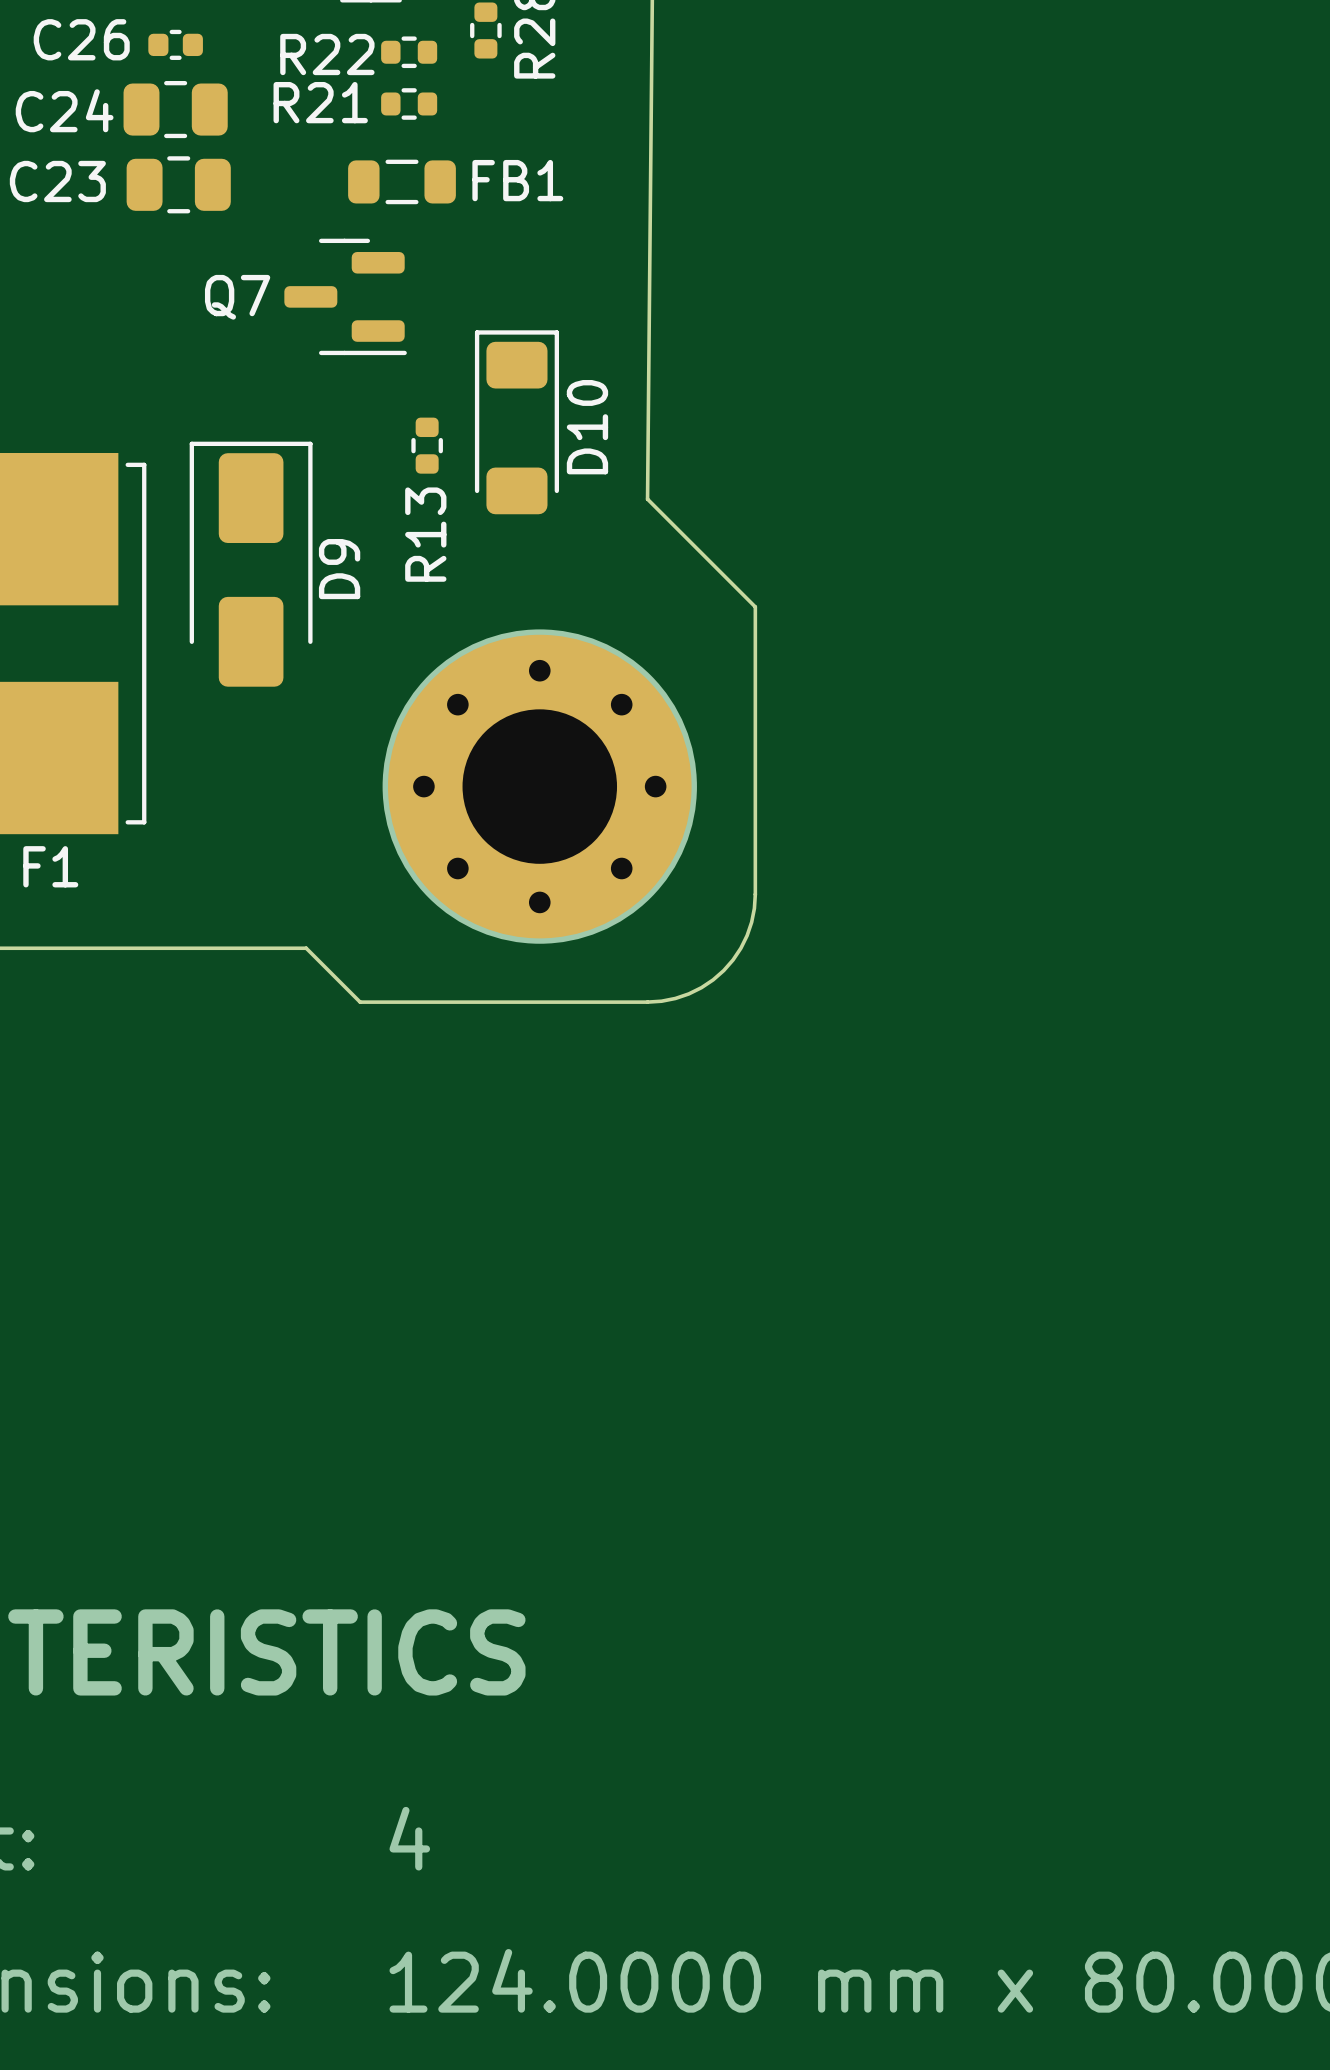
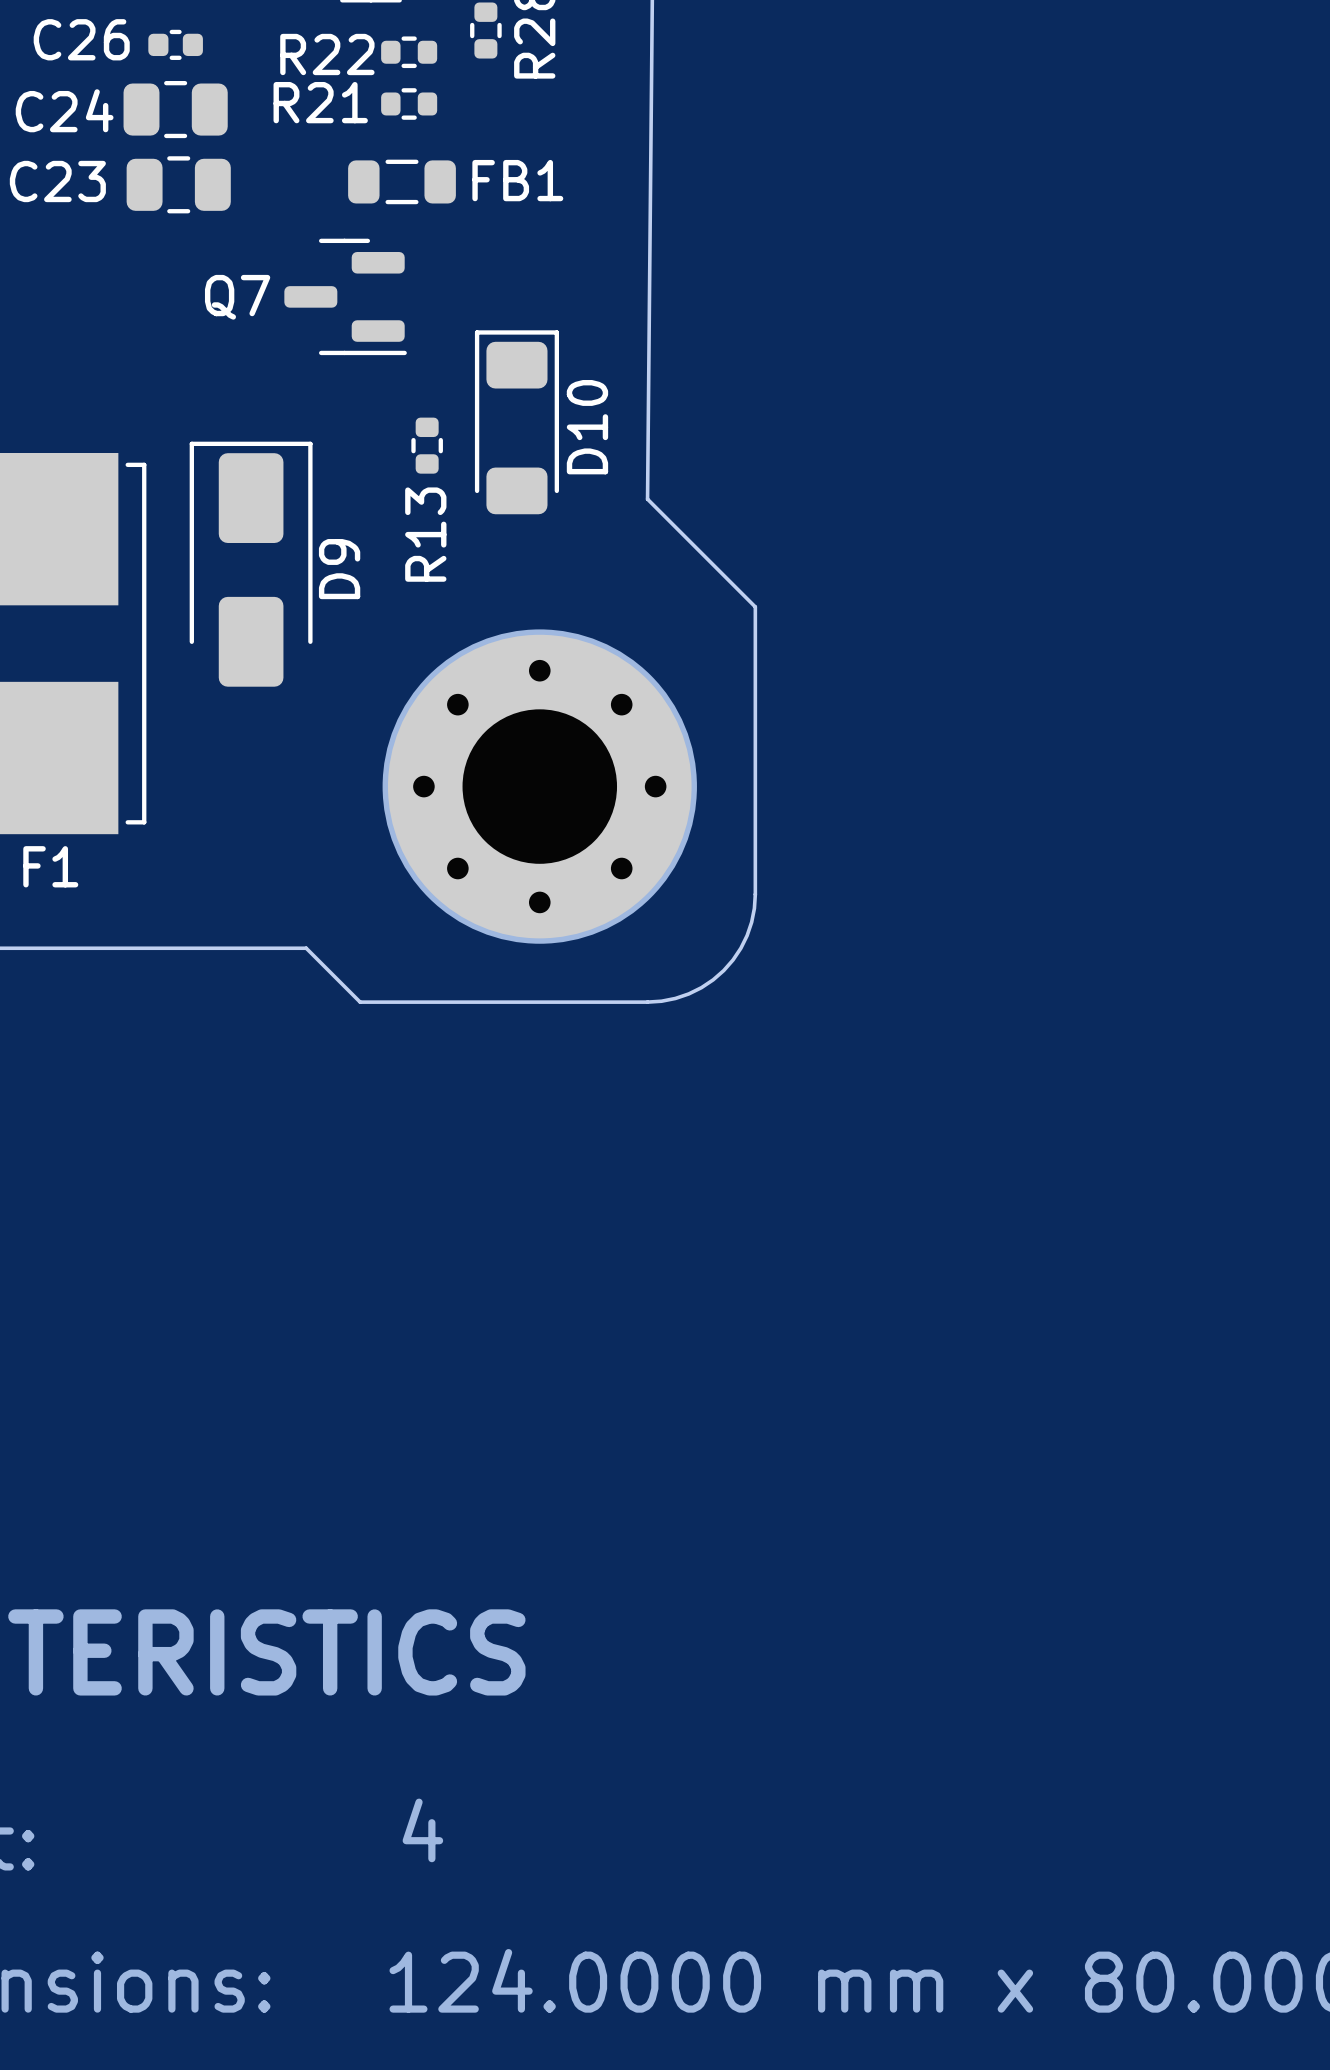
text position: 4 (409, 1838) -> 4 (422, 1830)

